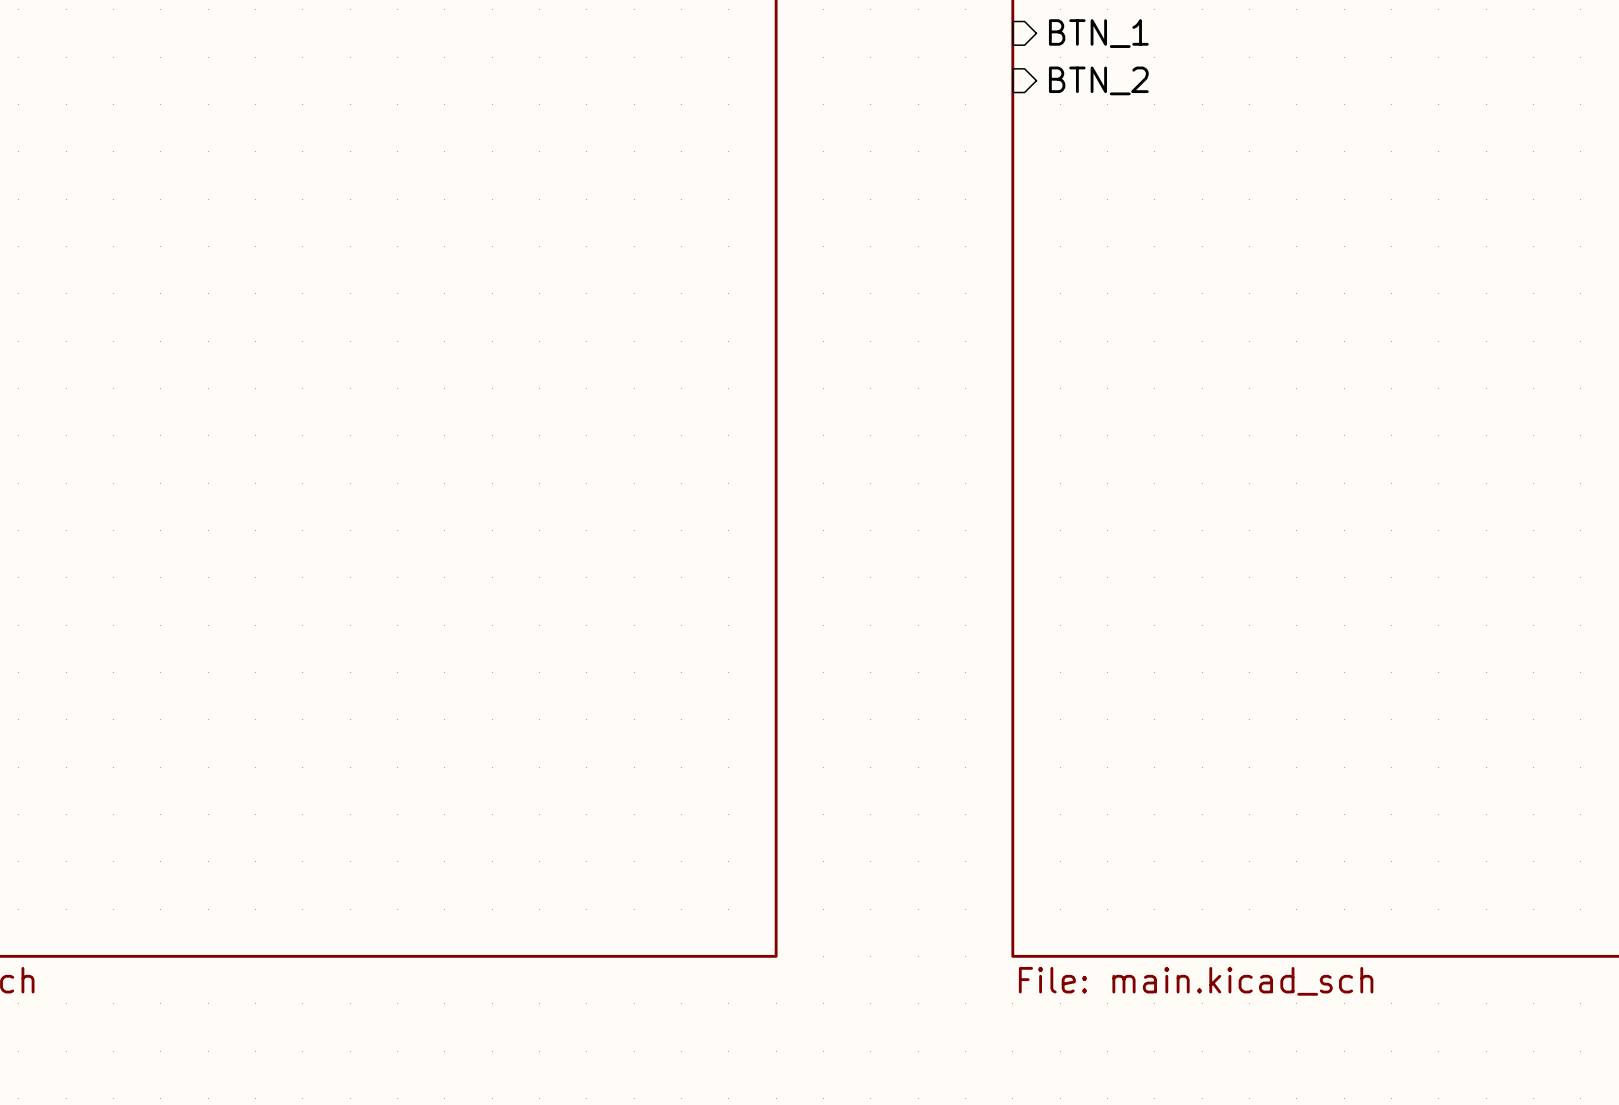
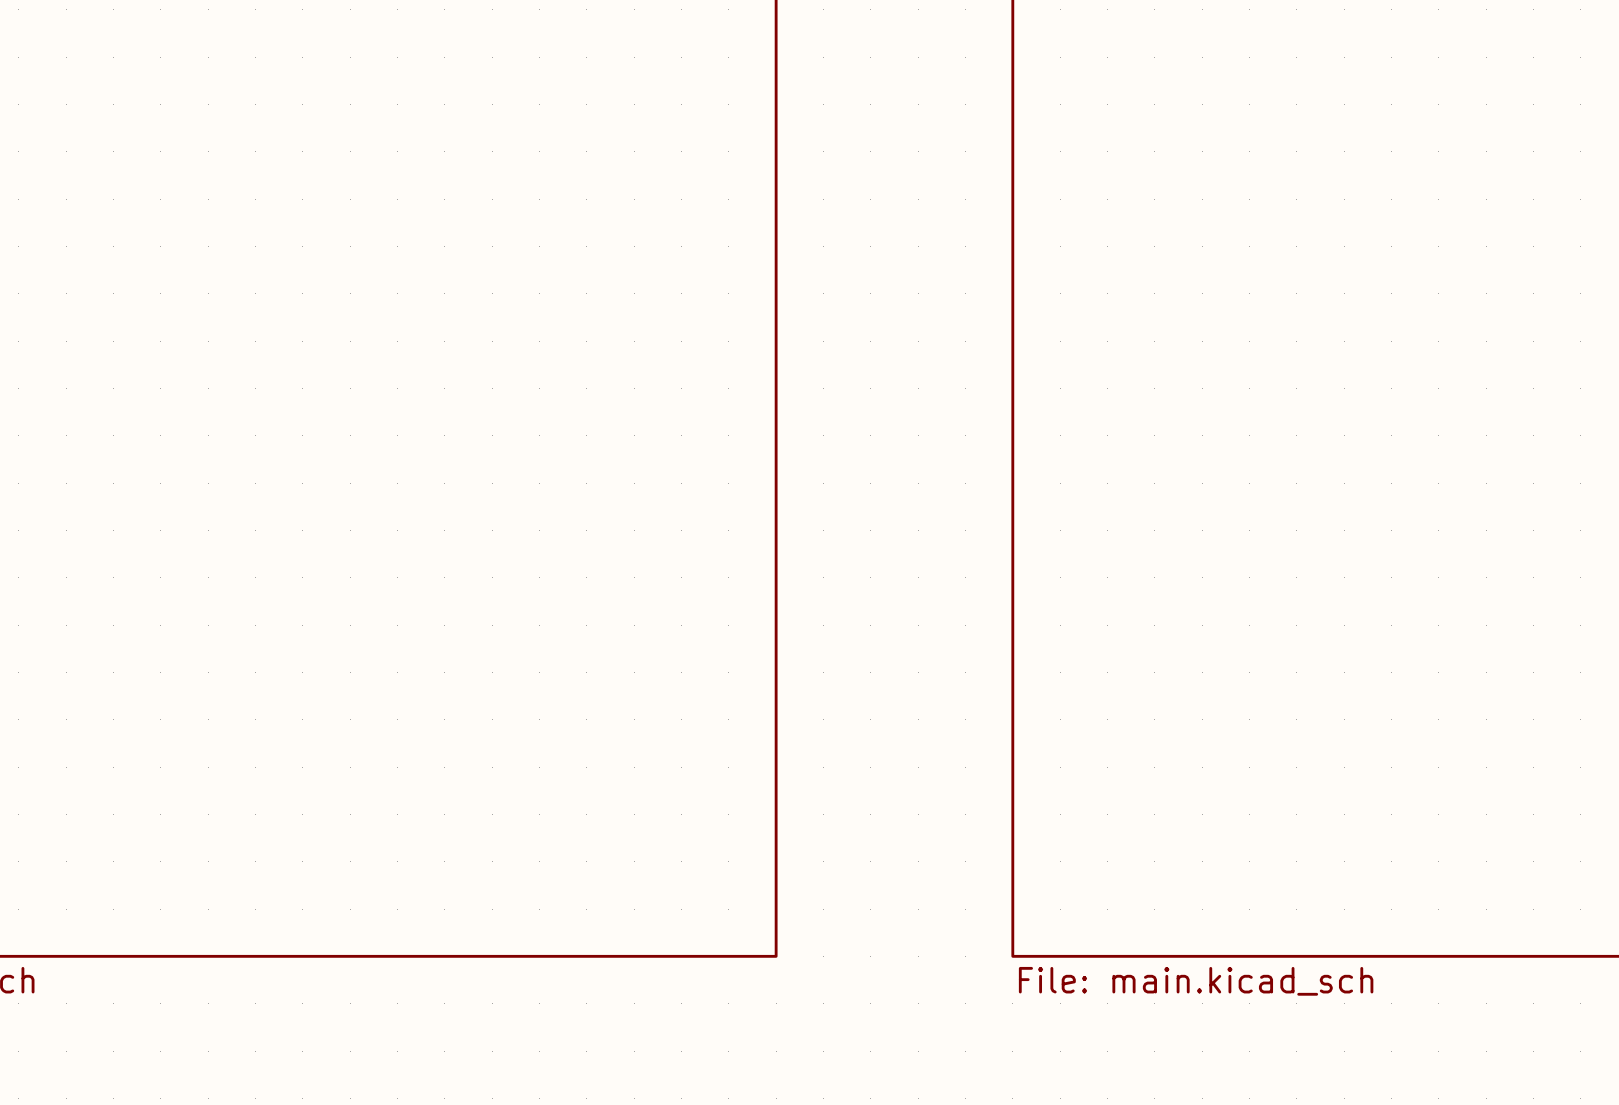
sheet pin: BTN_1 (1098, 33) -> none
sheet pin: BTN_2 (1098, 80) -> none

